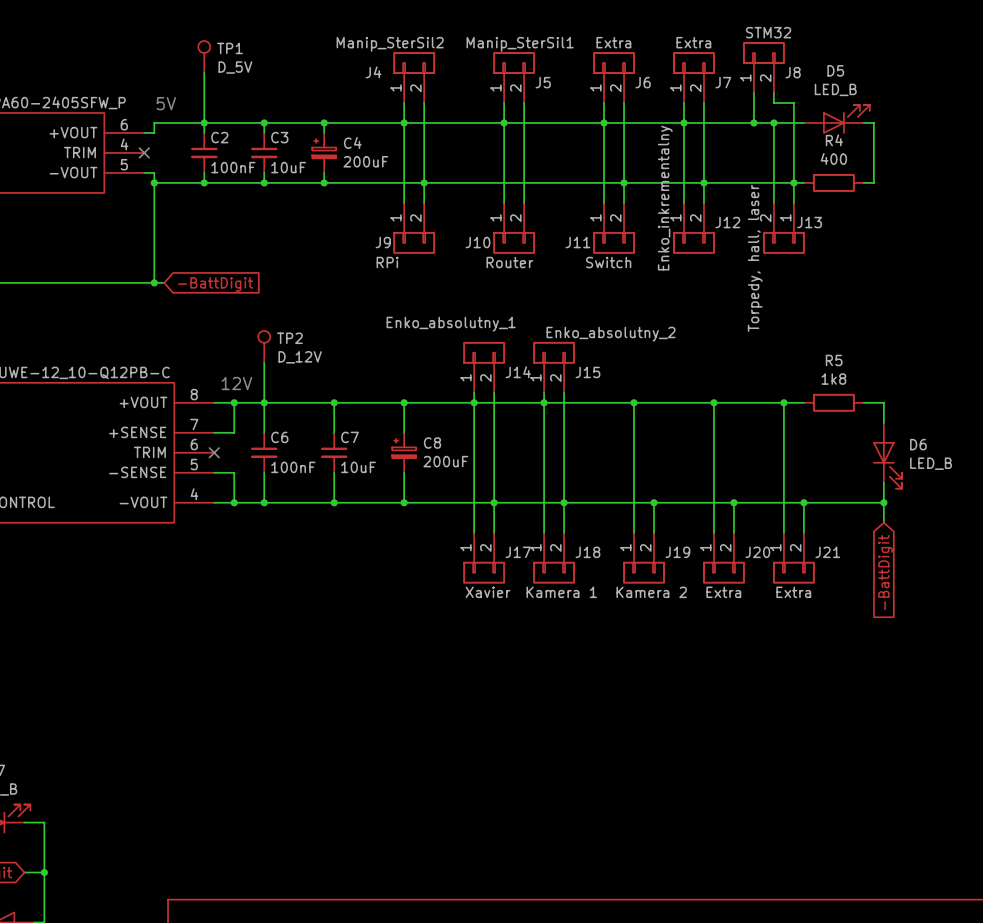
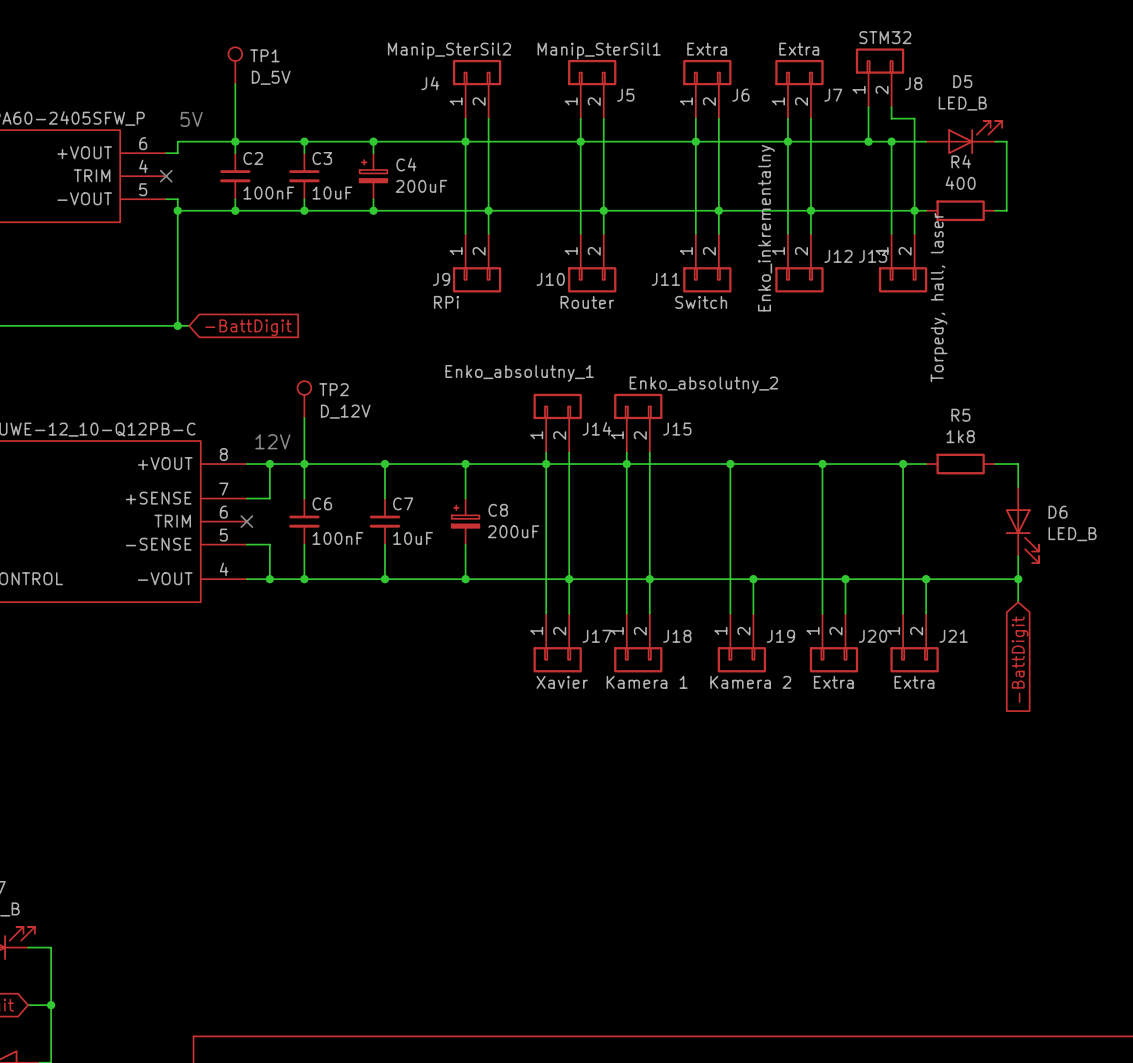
junction: none -> (603, 210)
J13 flip: as is (783, 242) -> left-right (903, 279)

